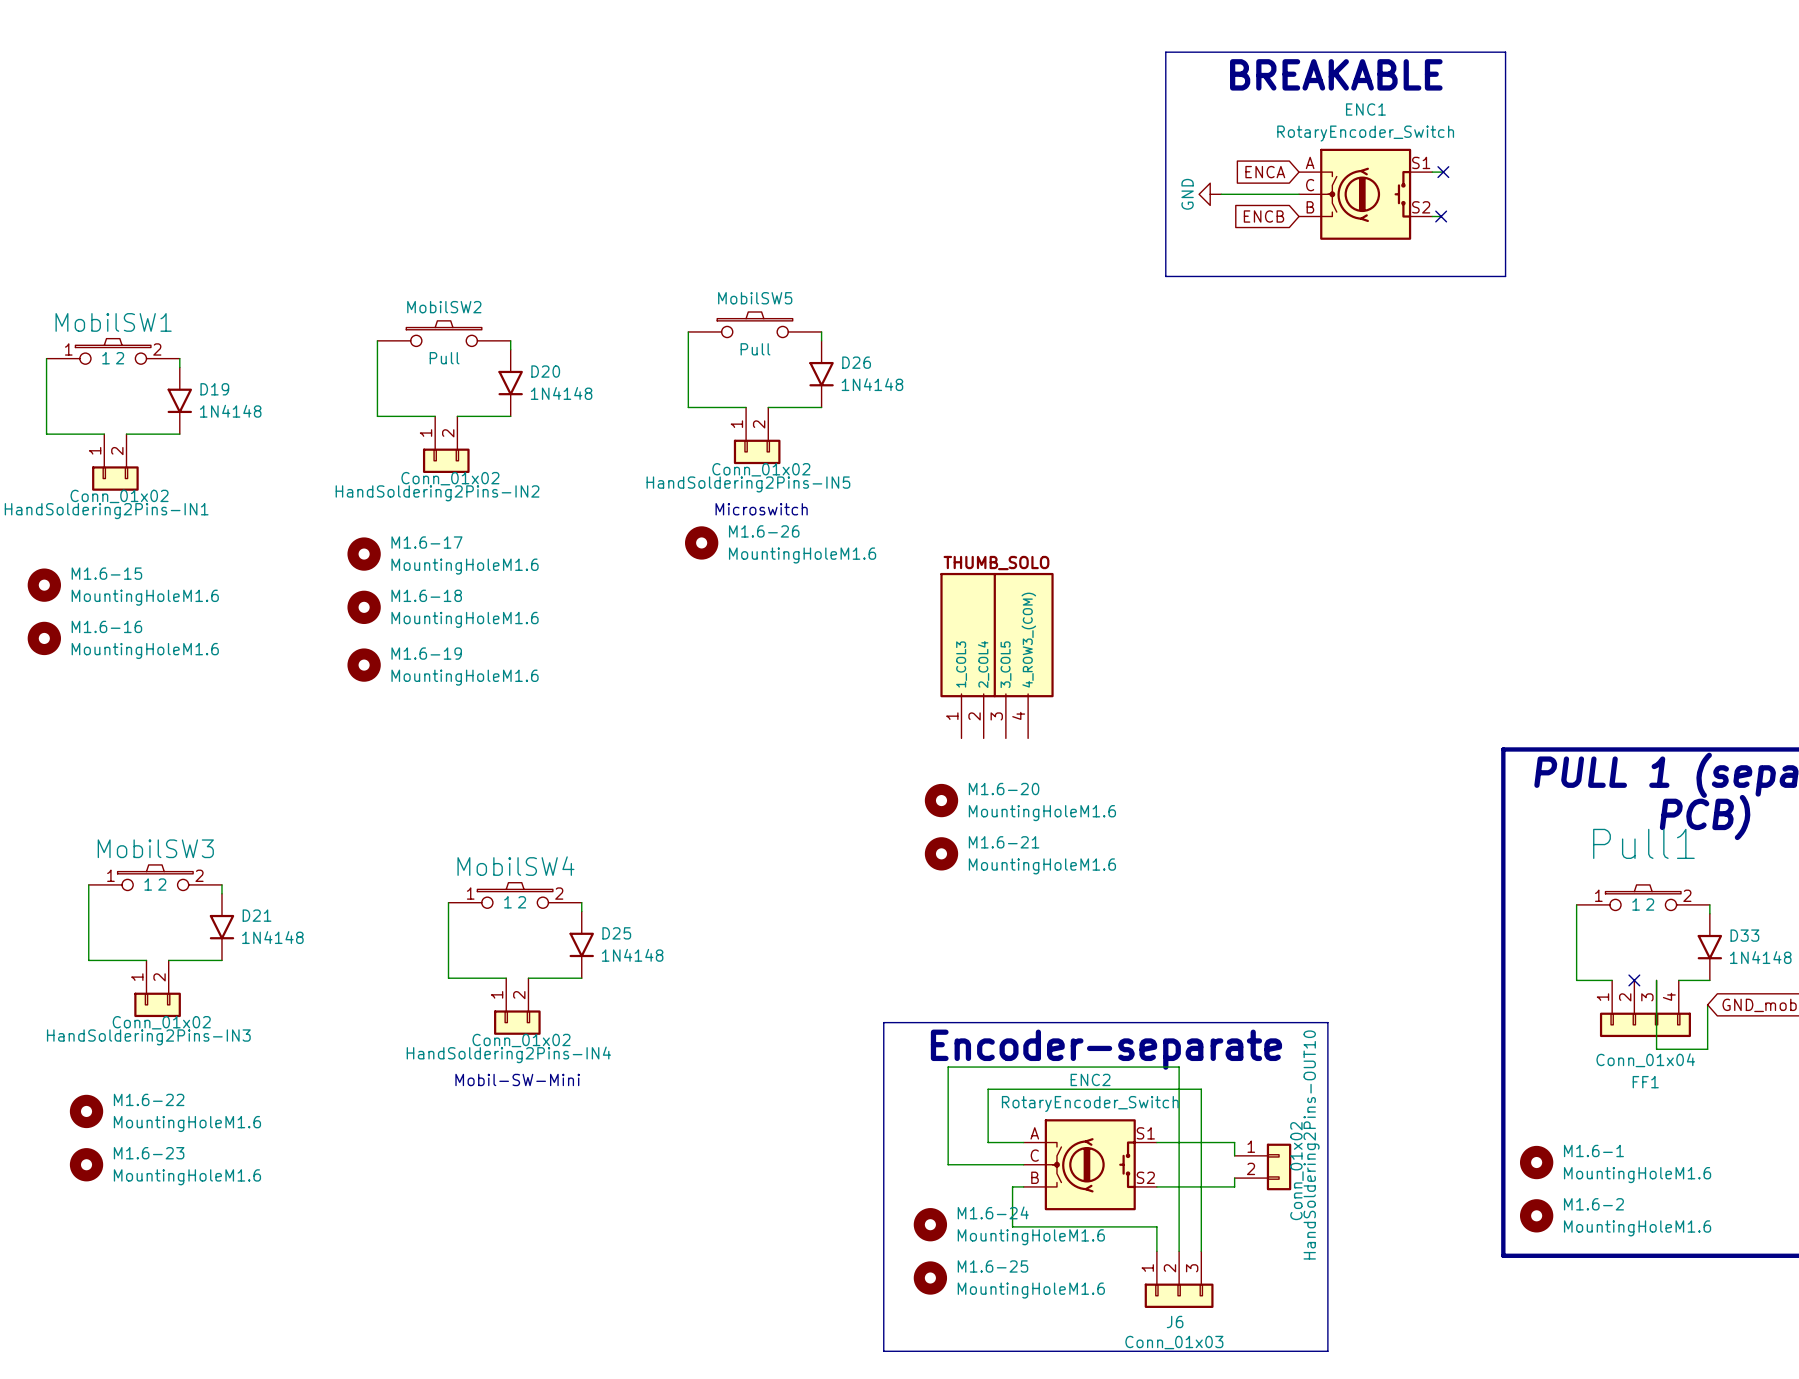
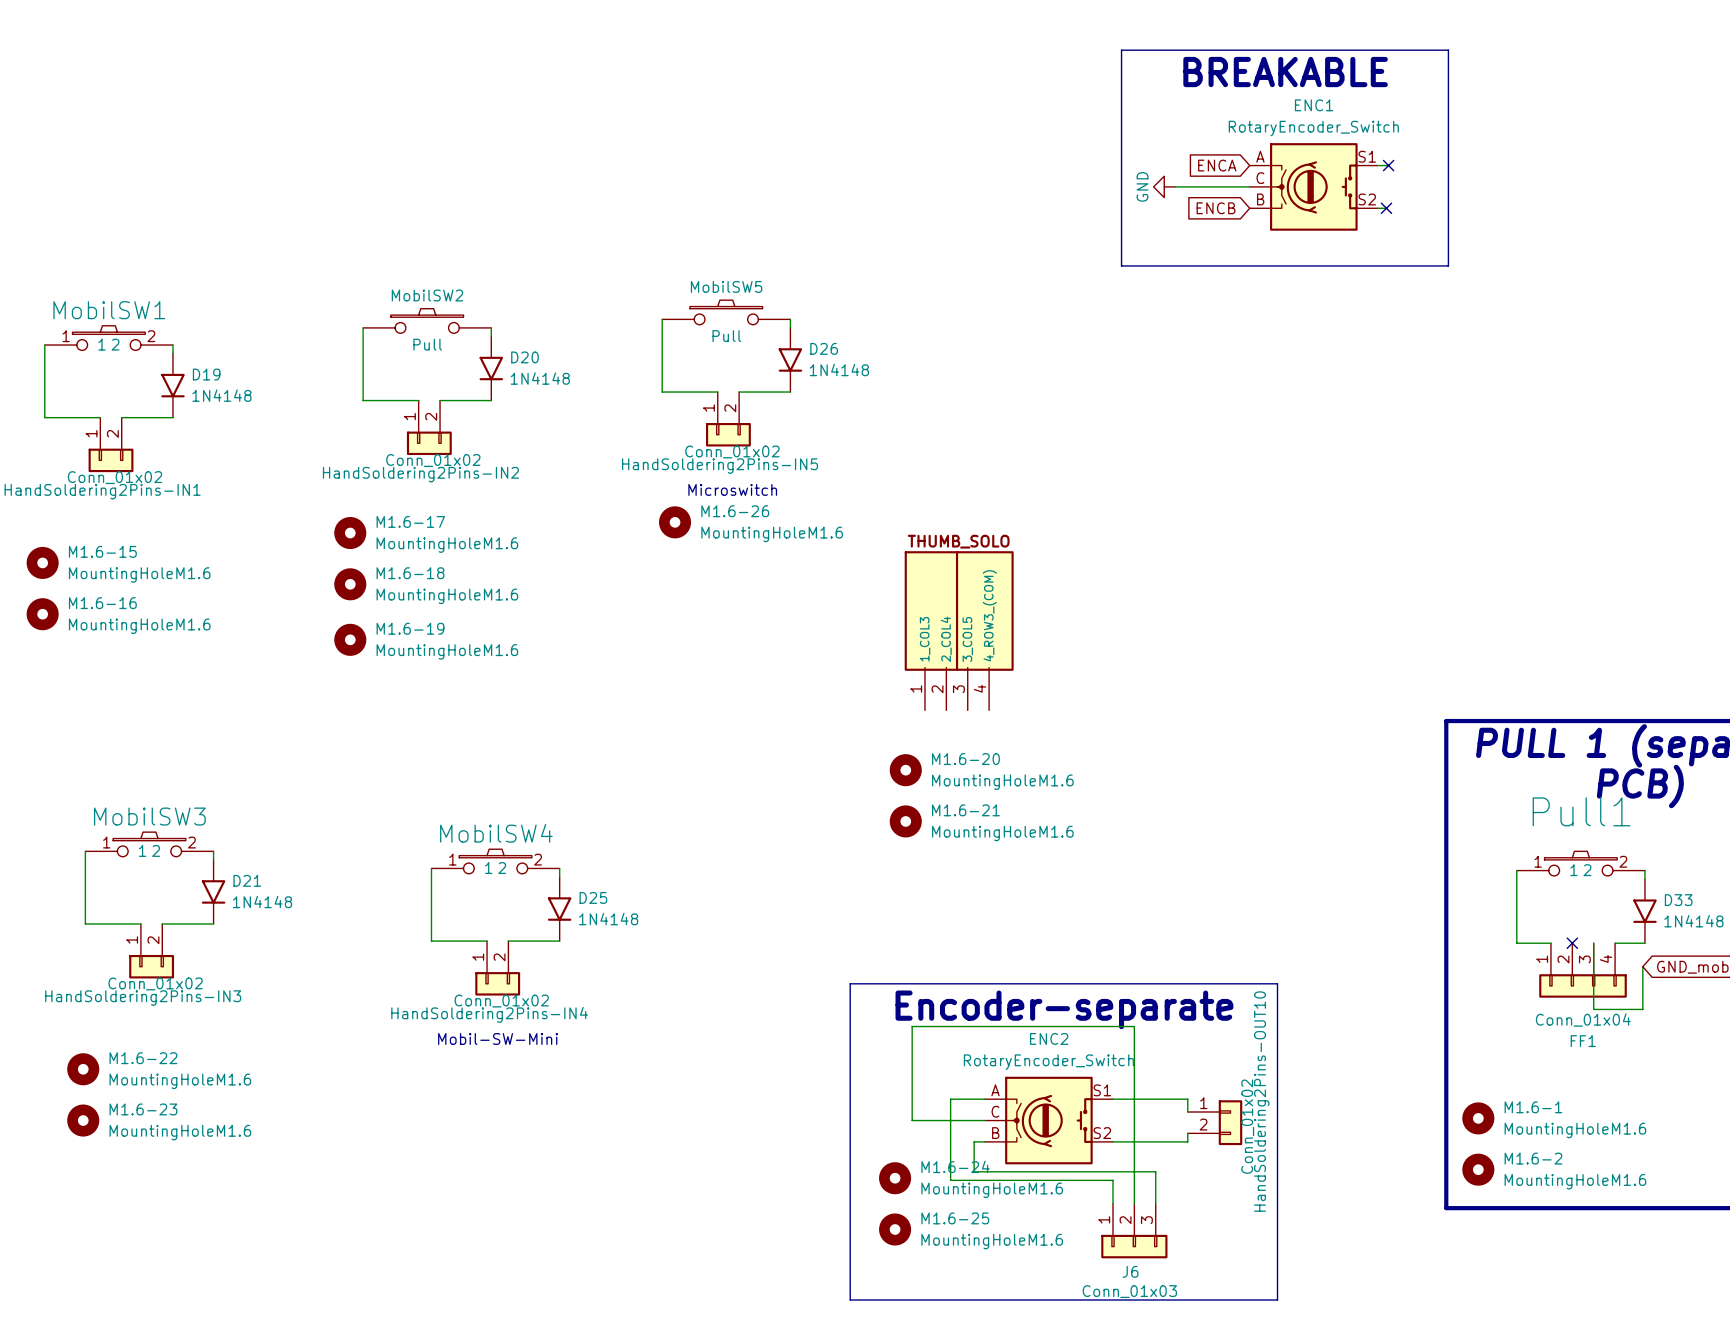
wire: (988, 1142) (988, 1089) (1201, 1089) (1201, 1218) -> (974, 1171) (1155, 1171)
wire: (1012, 1218) (1012, 1226) -> (950, 1099) (950, 1180) (974, 1180)

